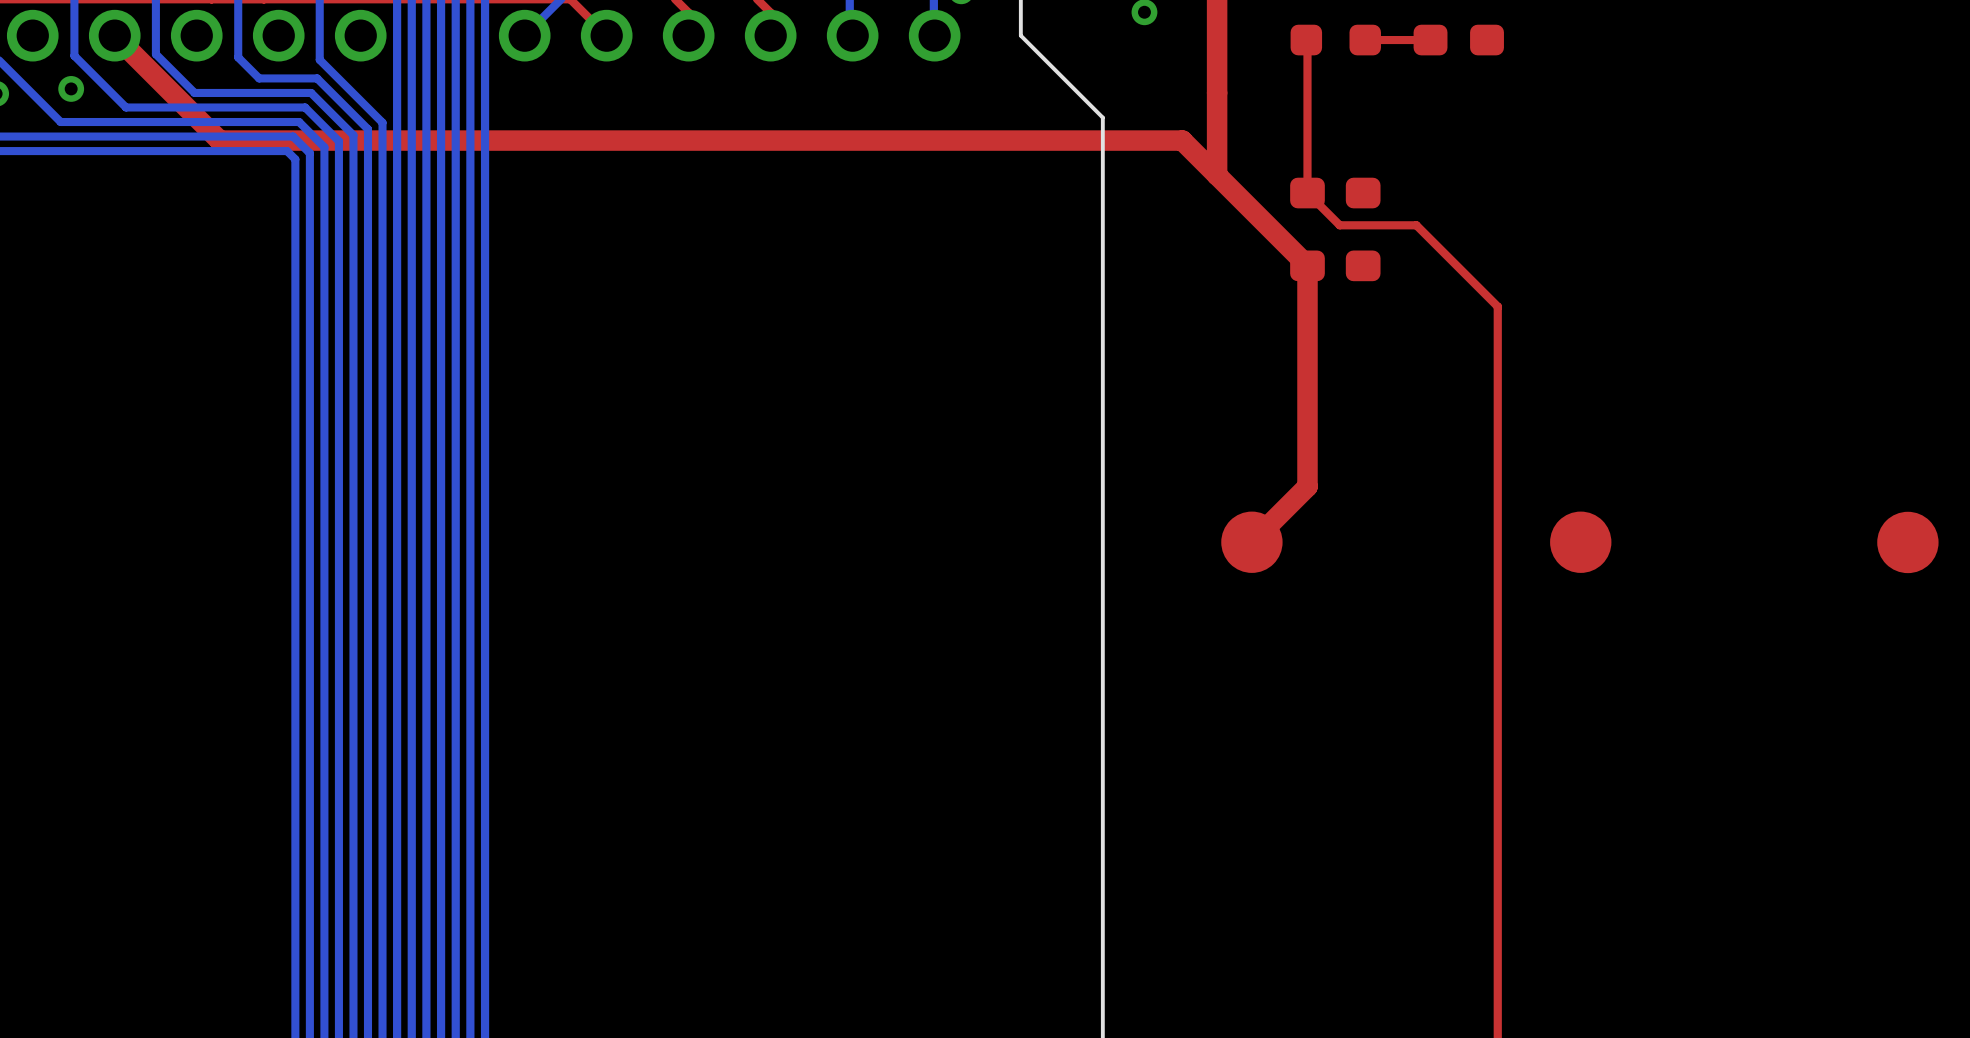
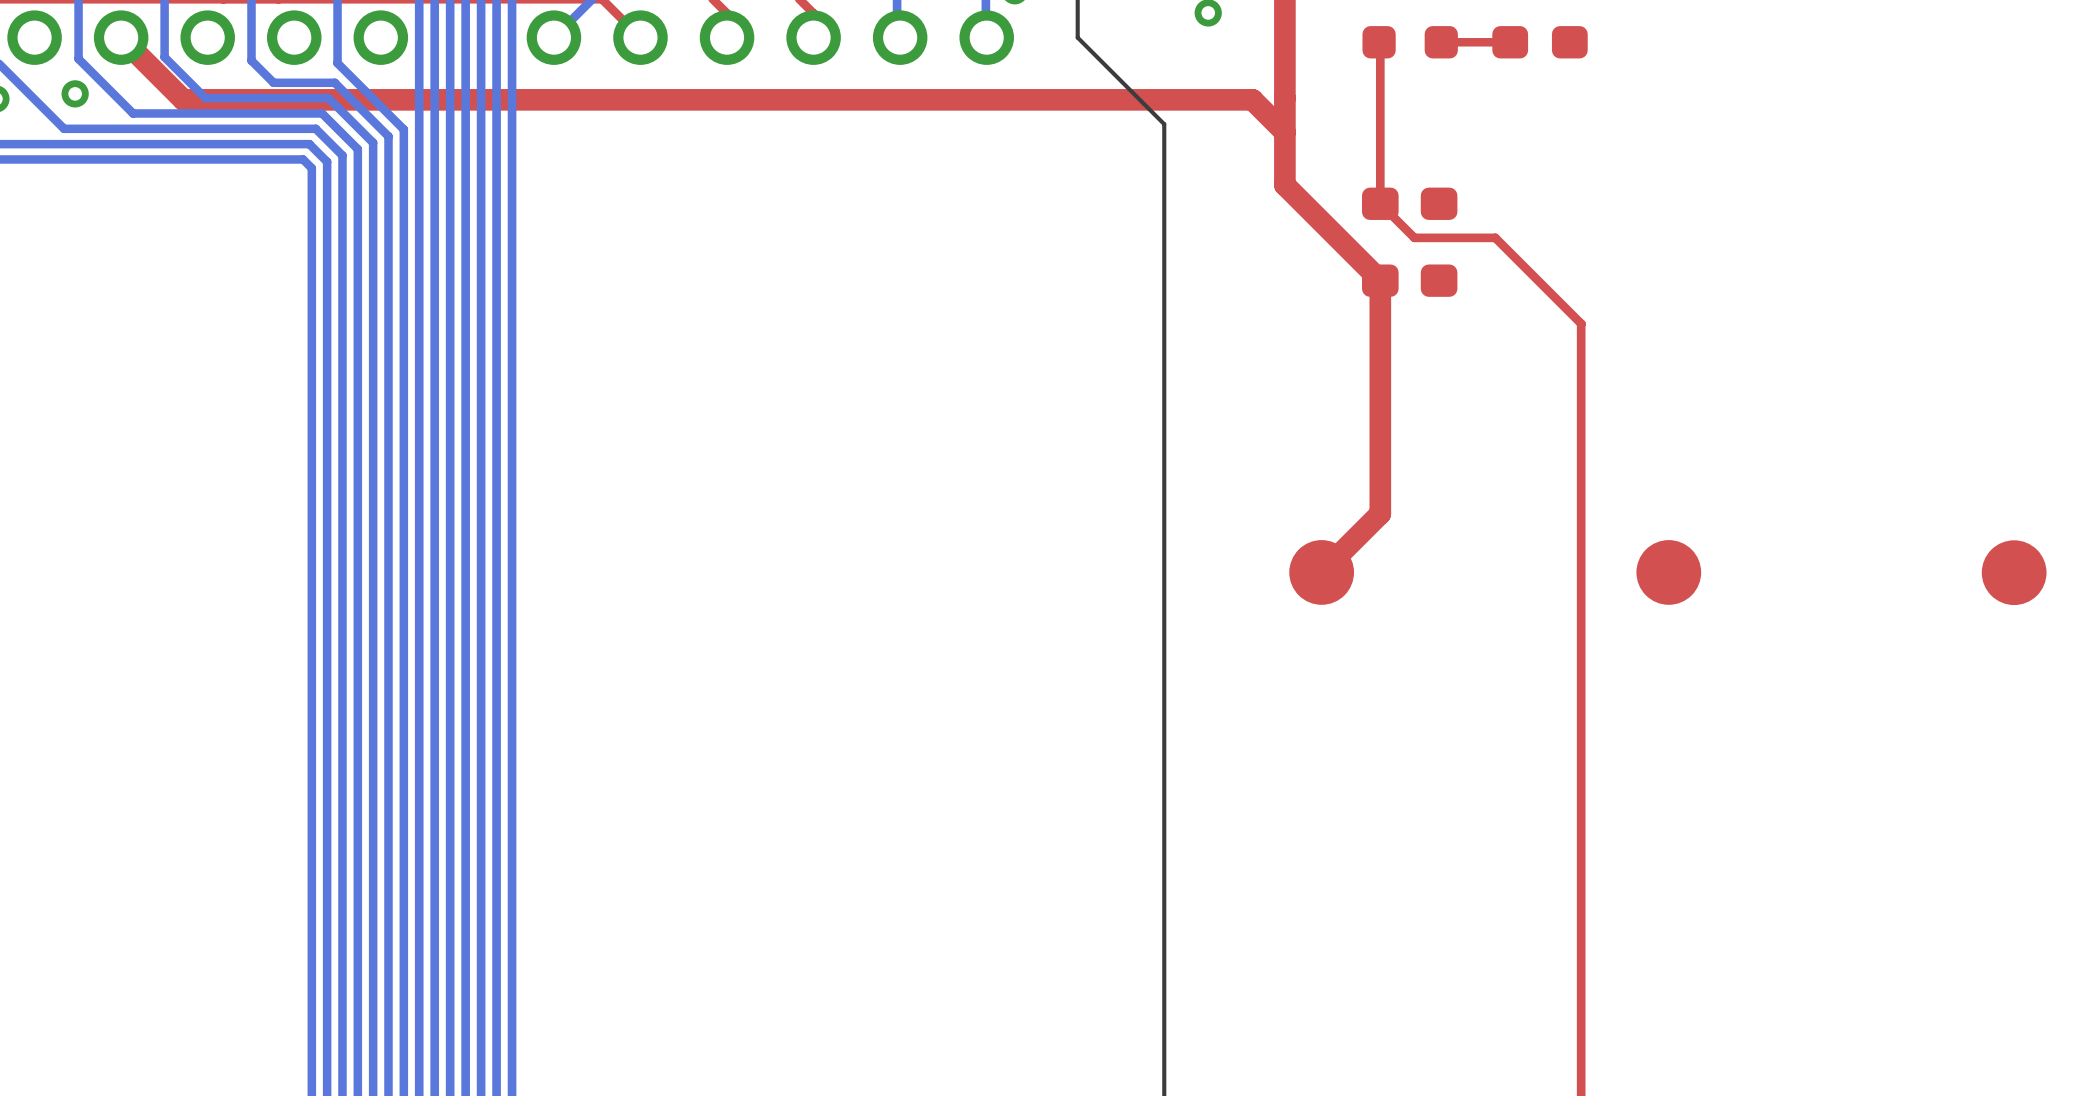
top track: (173, 94) (219, 140) (1182, 140) (1217, 175) -> (183, 99) (1252, 99) (1284, 132)

